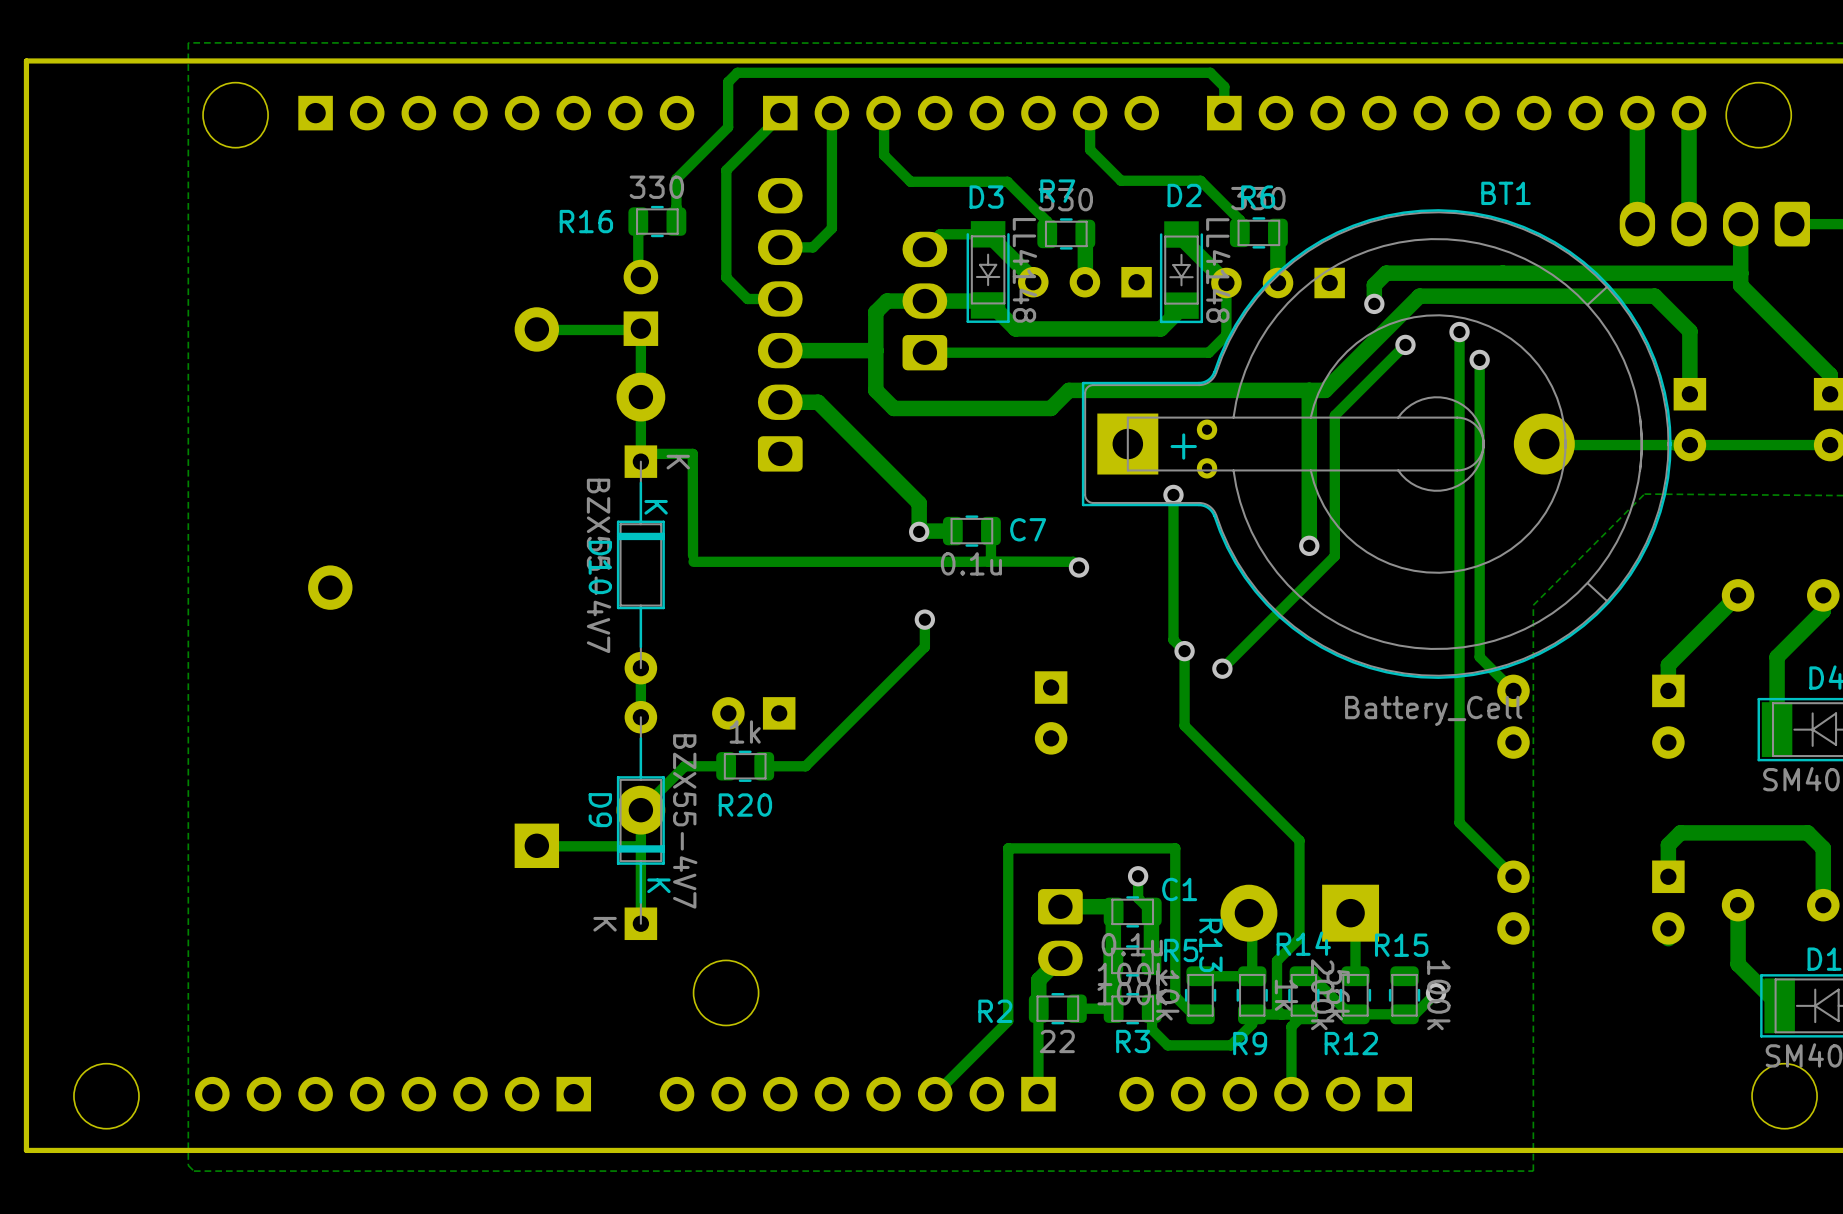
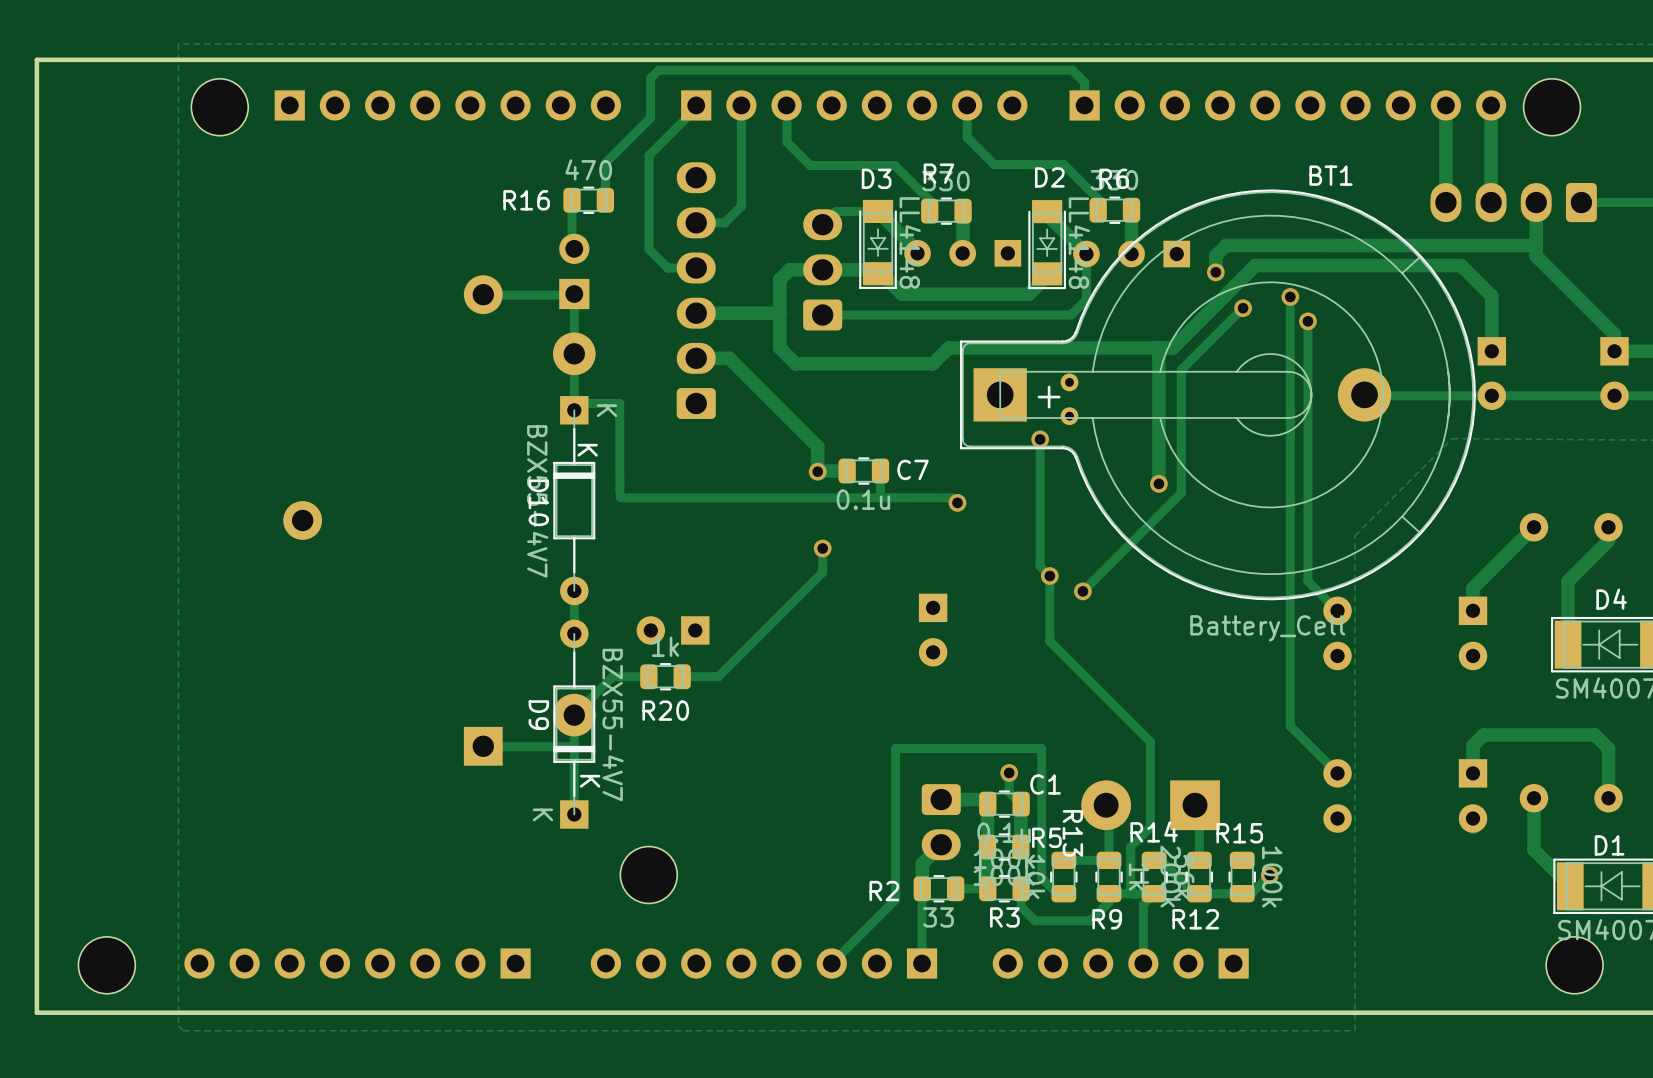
R16 value: 330 (656, 187) -> 470 (588, 169)
R2 value: 22 (1057, 1041) -> 33 (938, 917)

